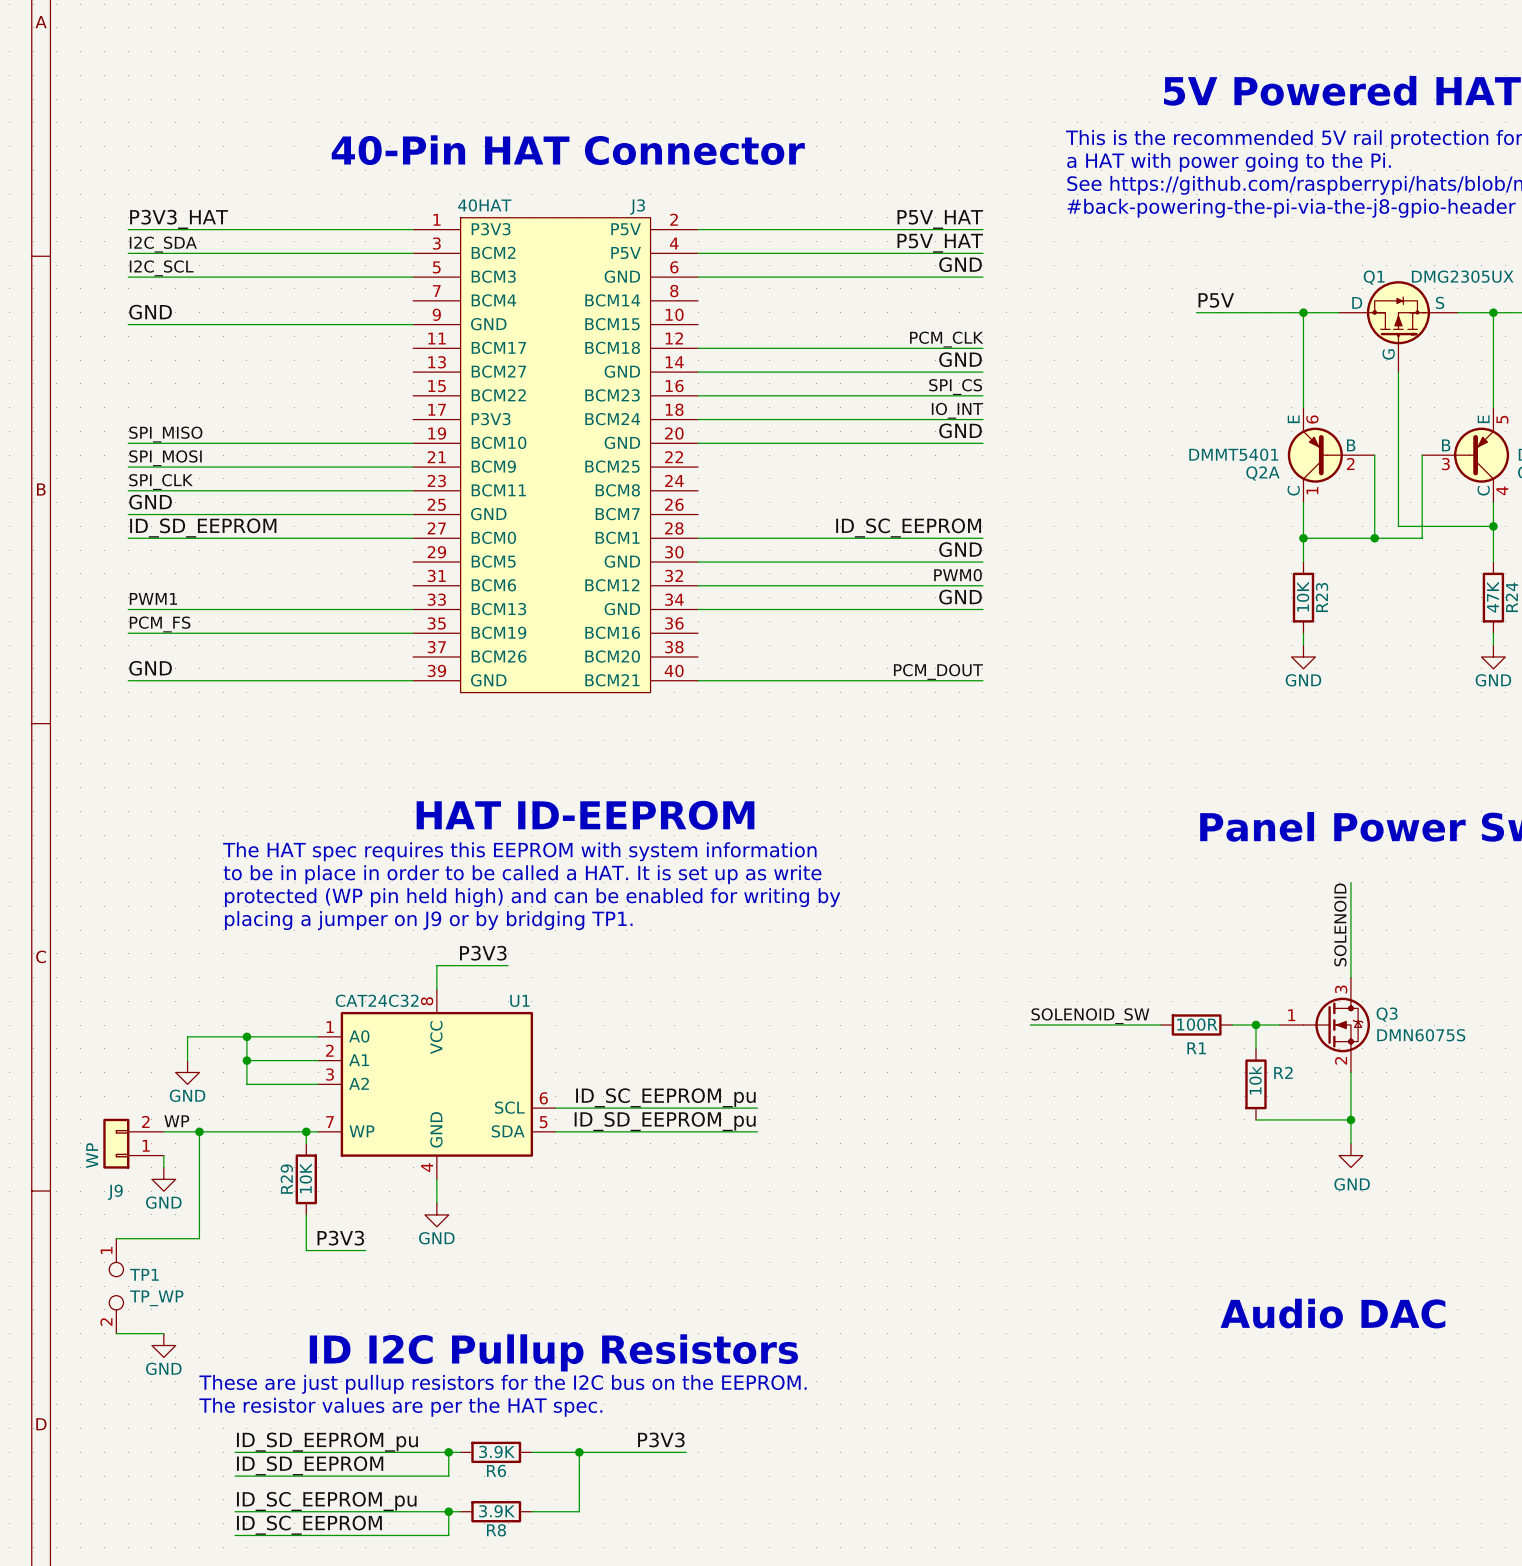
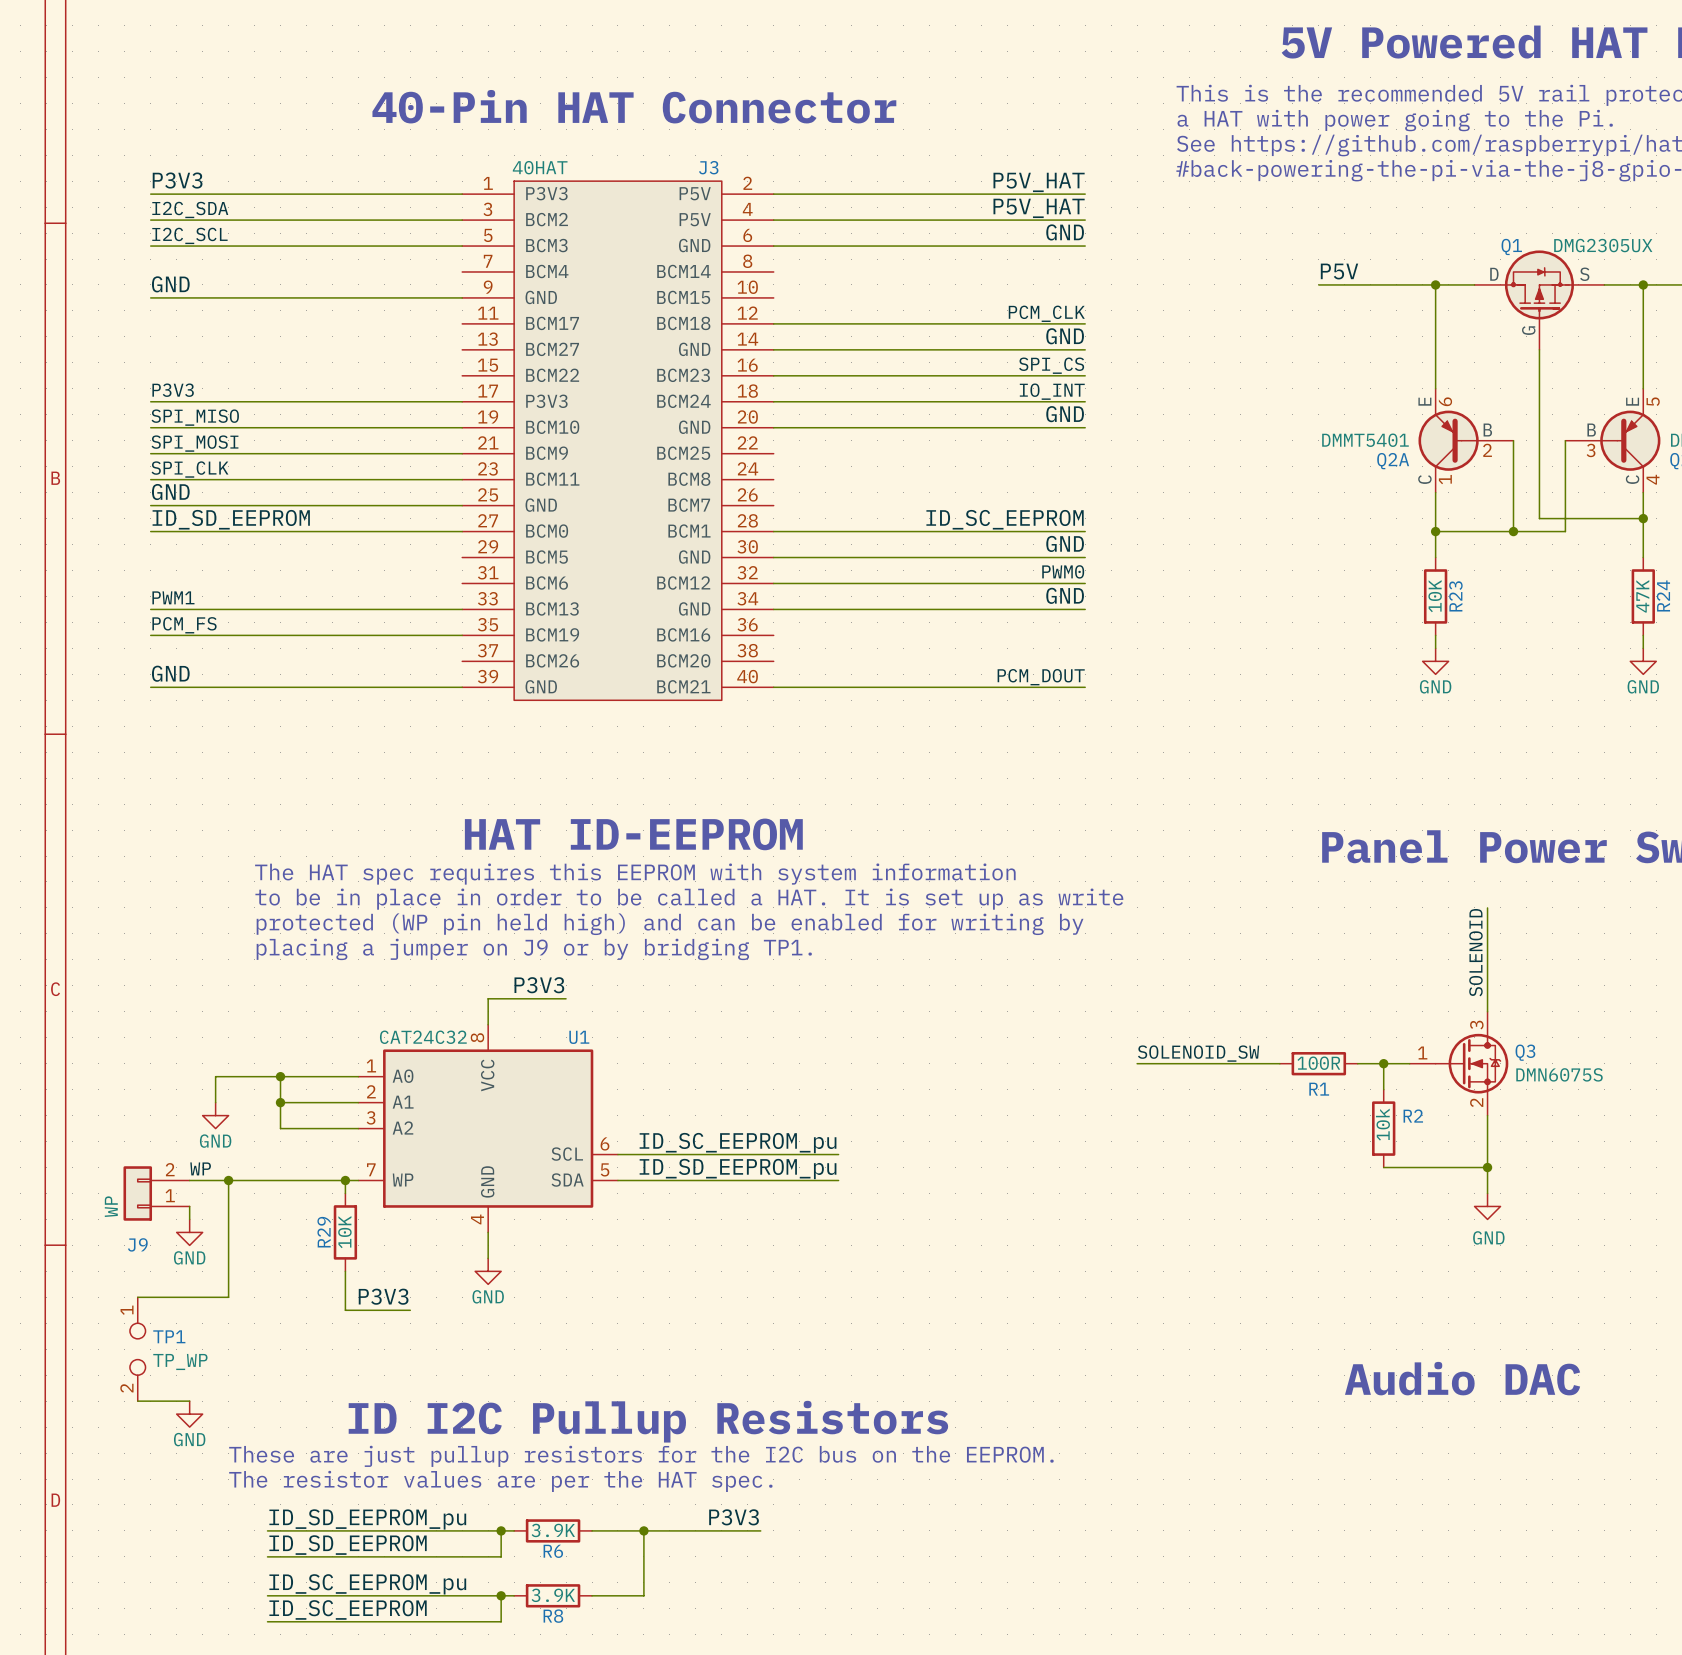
label: P3V3_HAT (179, 219) -> P3V3 (177, 180)
label: none -> P3V3 (173, 390)
wire: none -> (150, 401) (462, 401)

